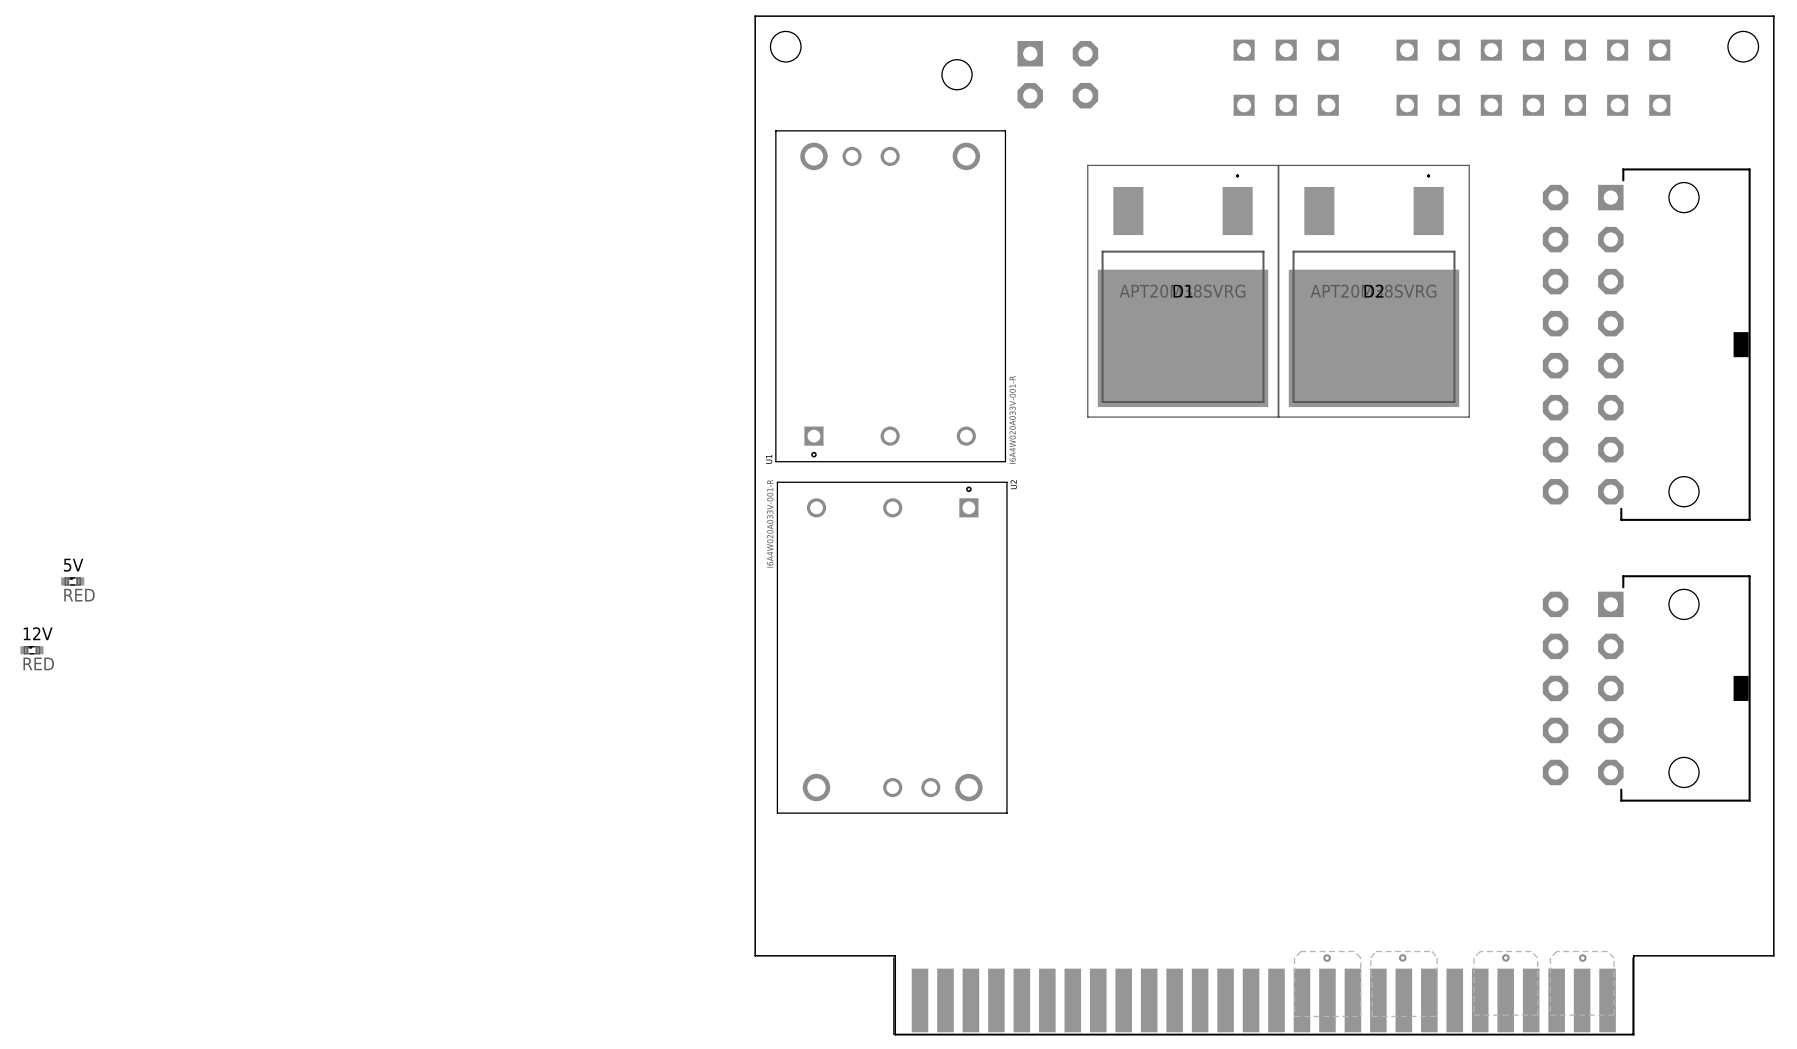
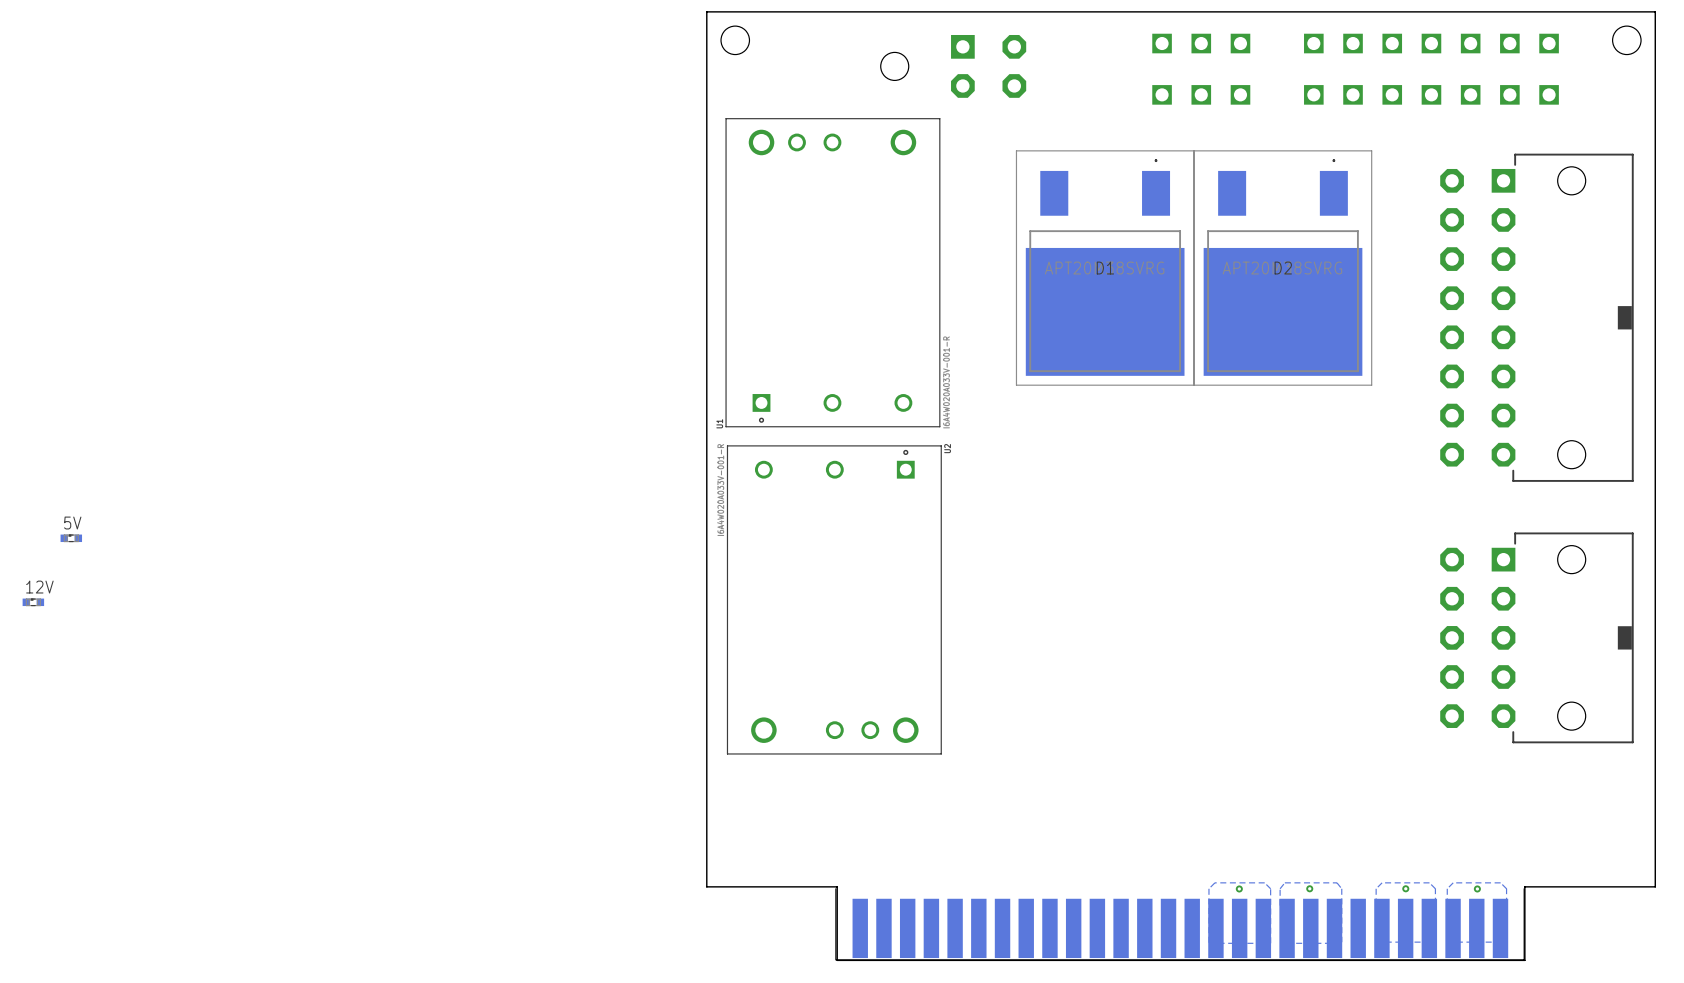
5V value: RED (79, 595) -> none
12V value: RED (38, 663) -> none

